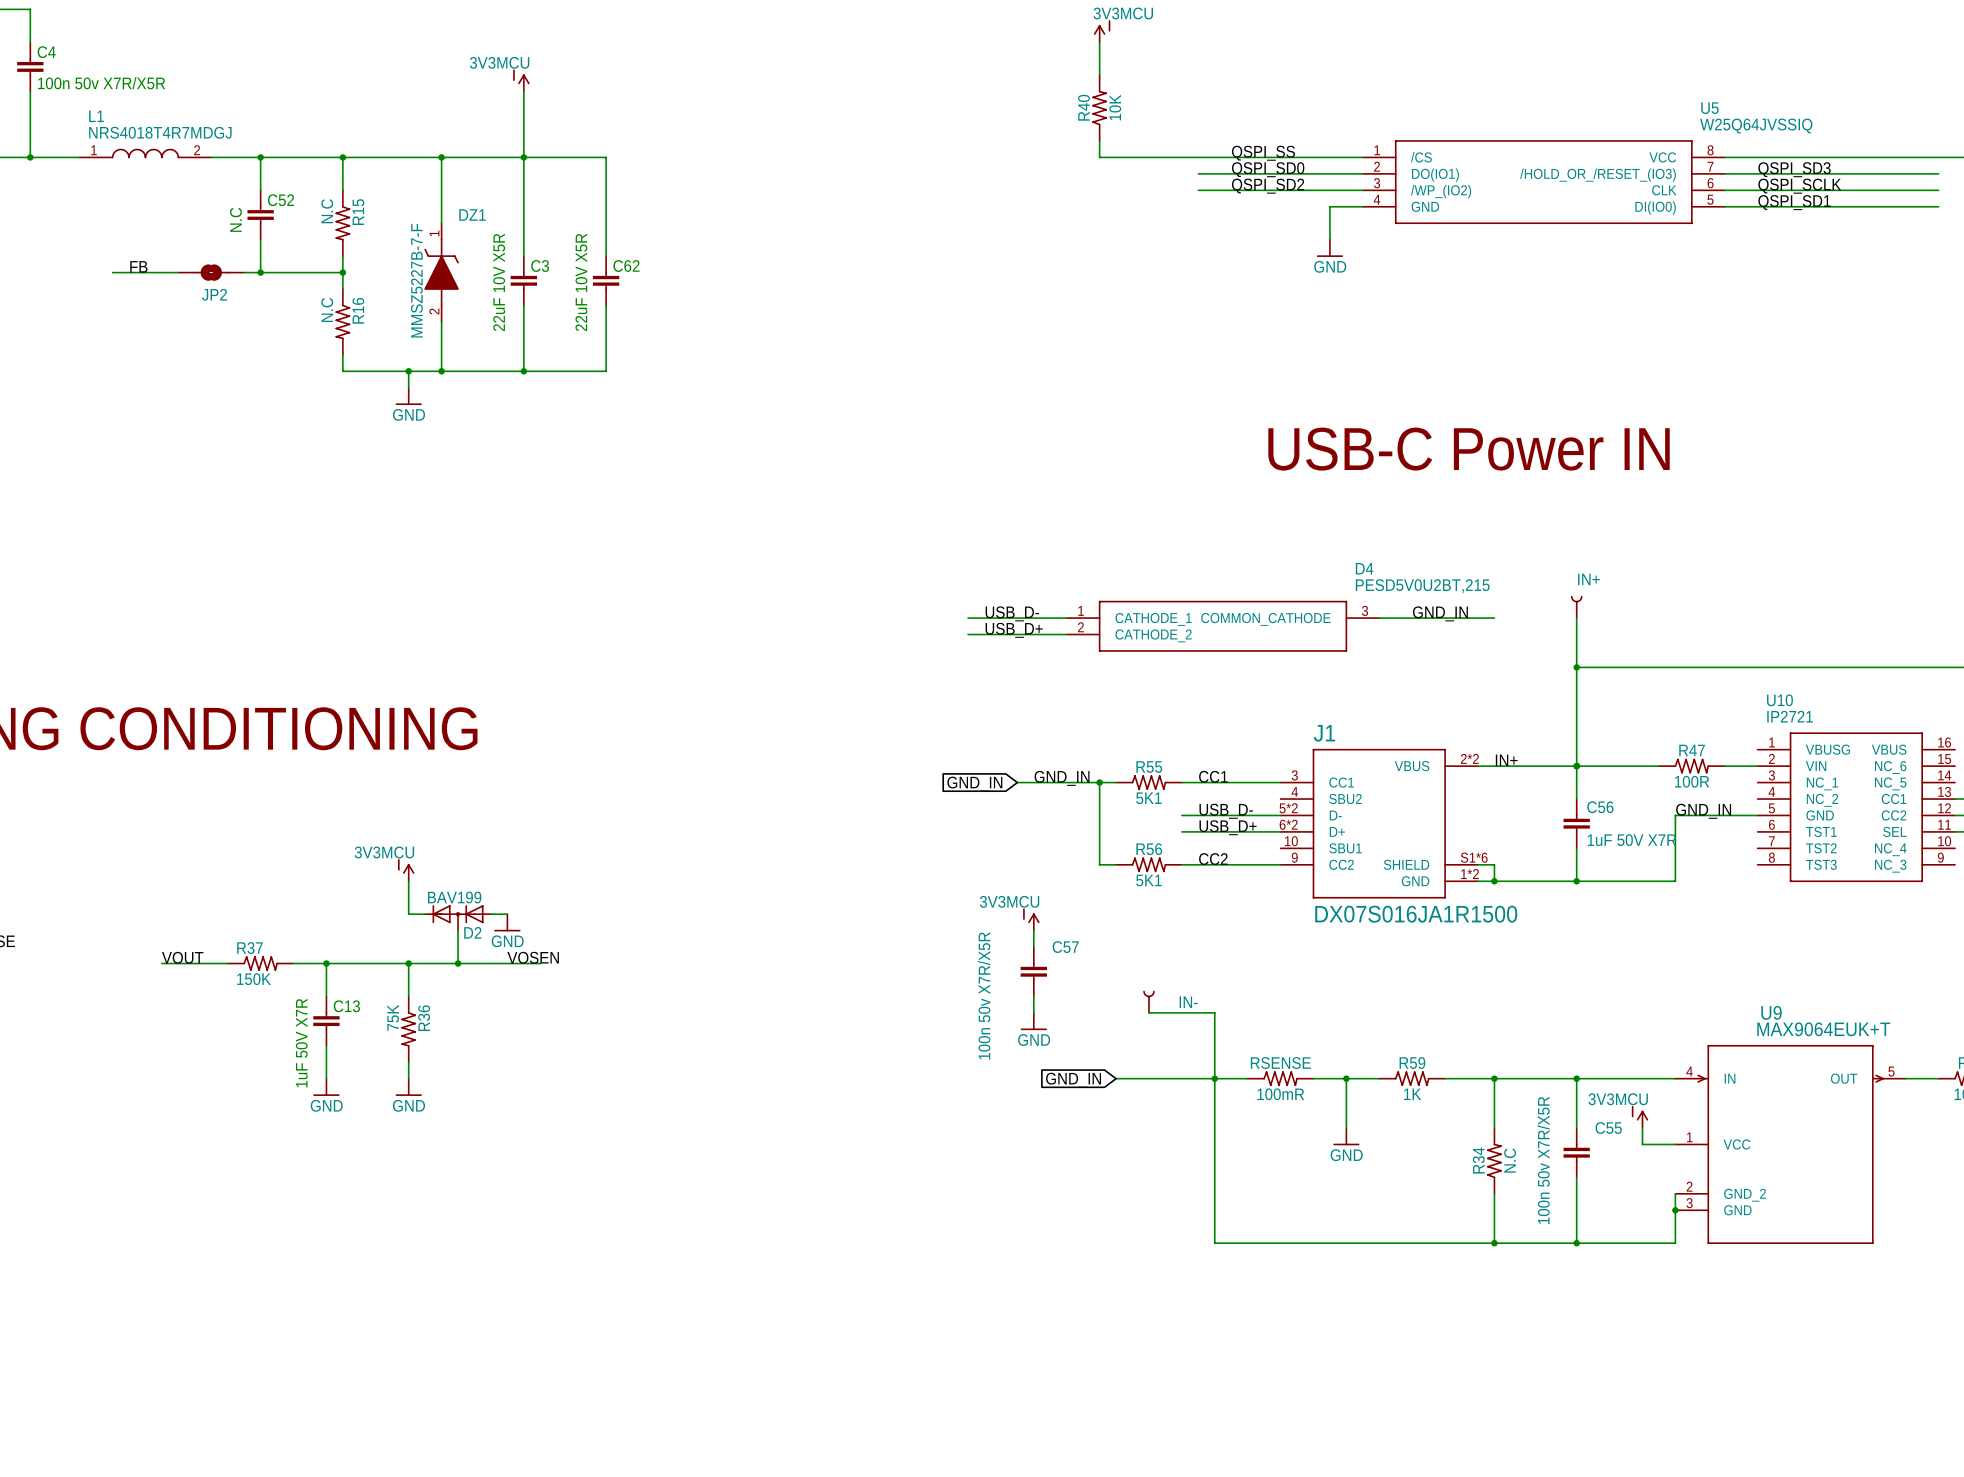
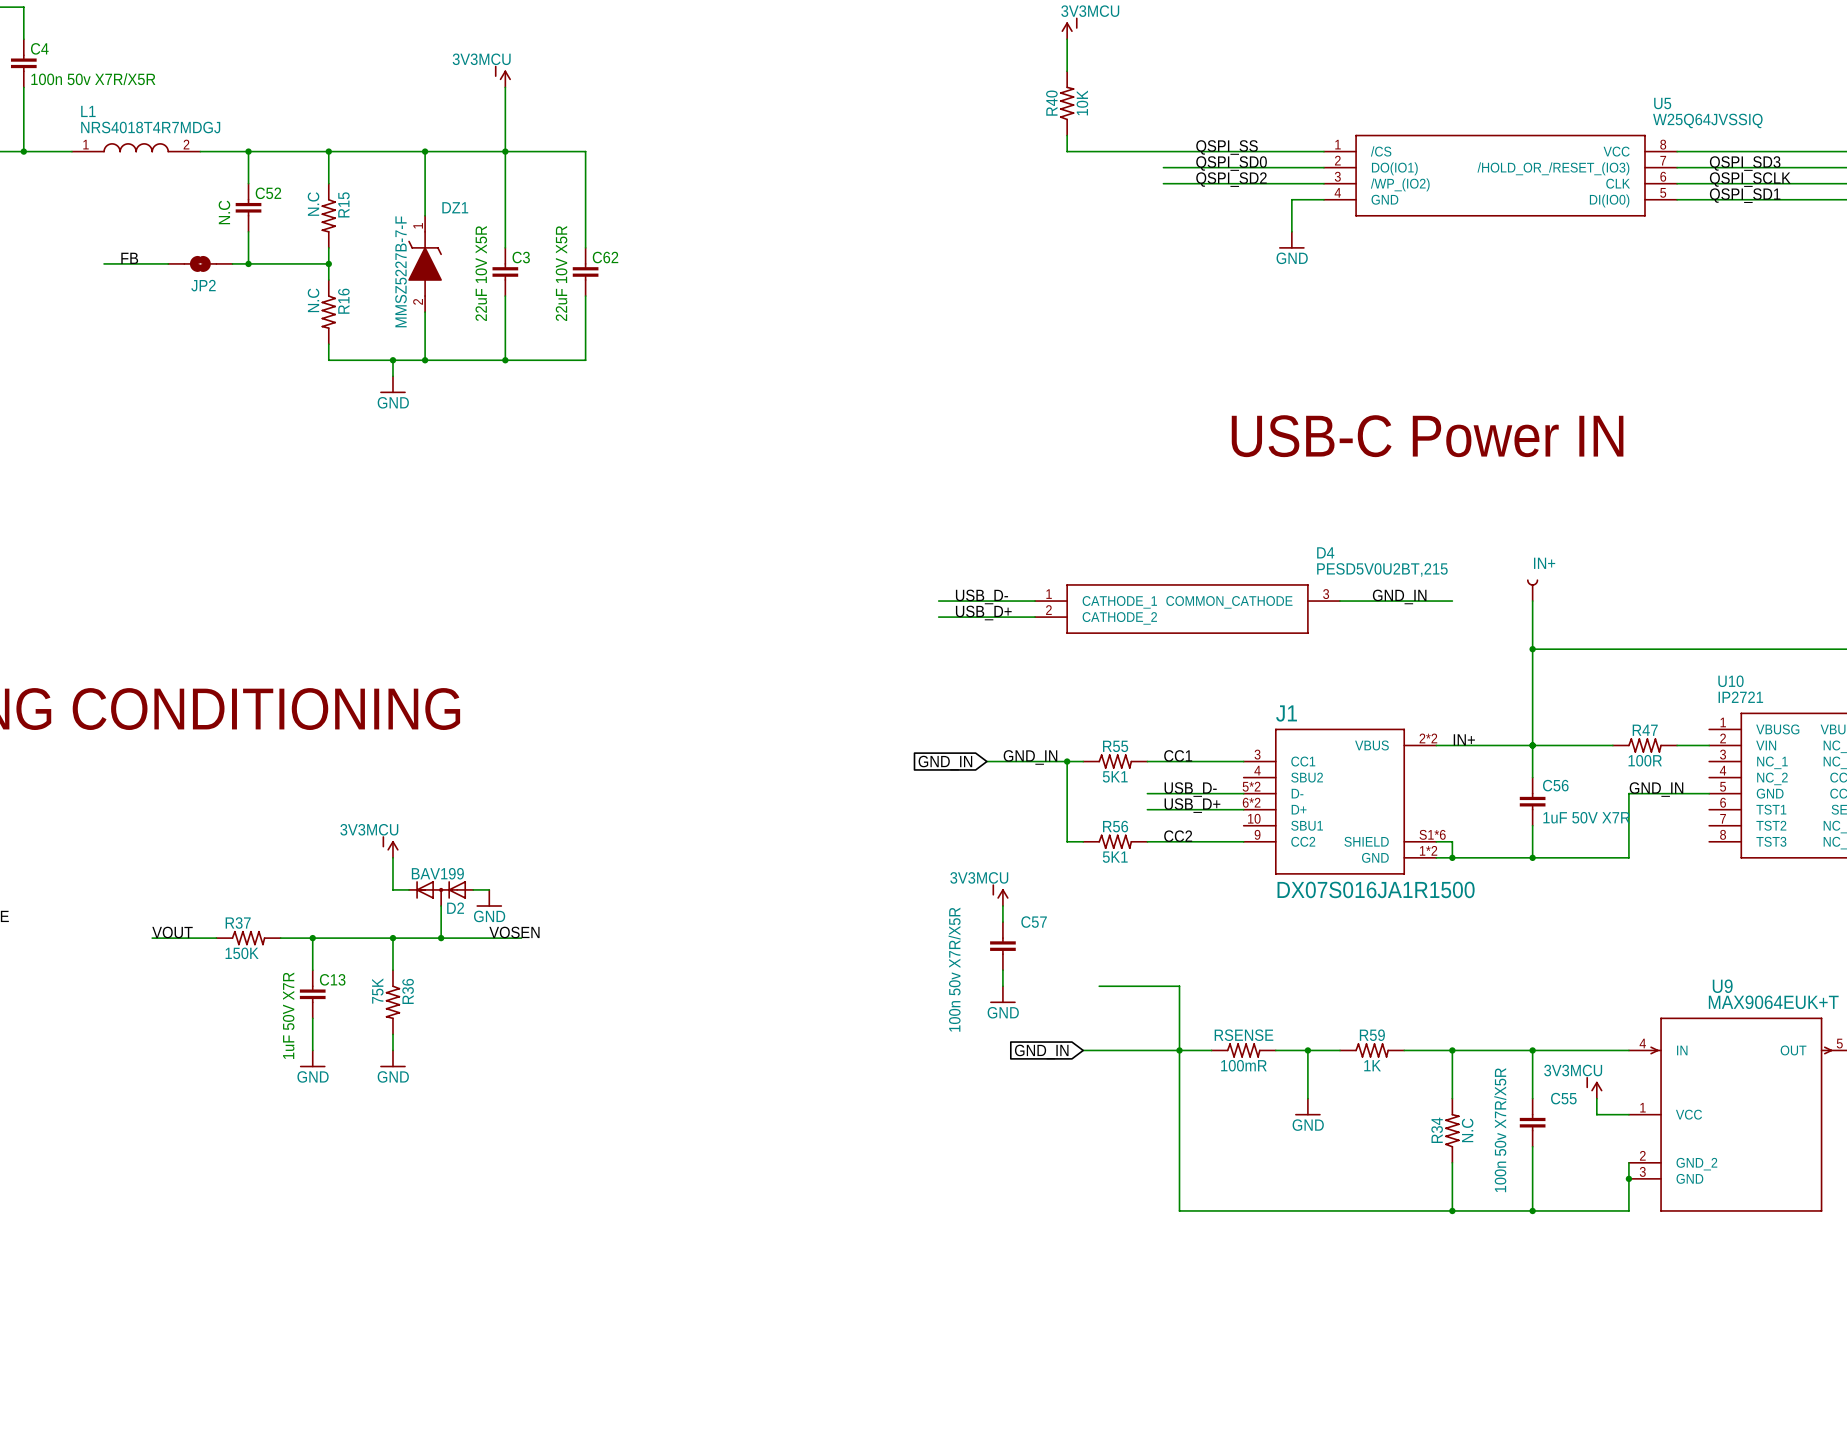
IN-: (1148, 1002) -> none
wire: none -> (1099, 986) (1115, 986)

